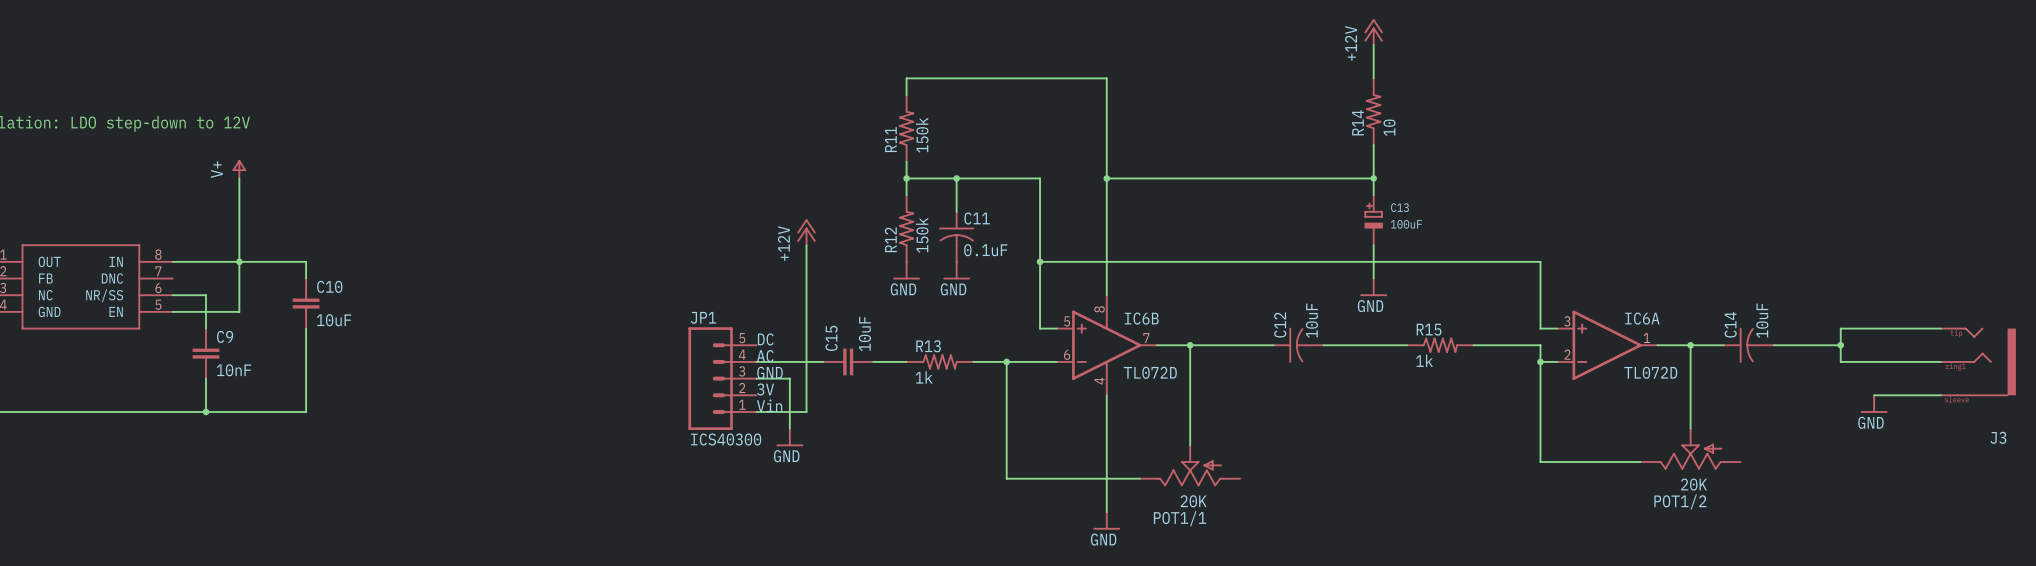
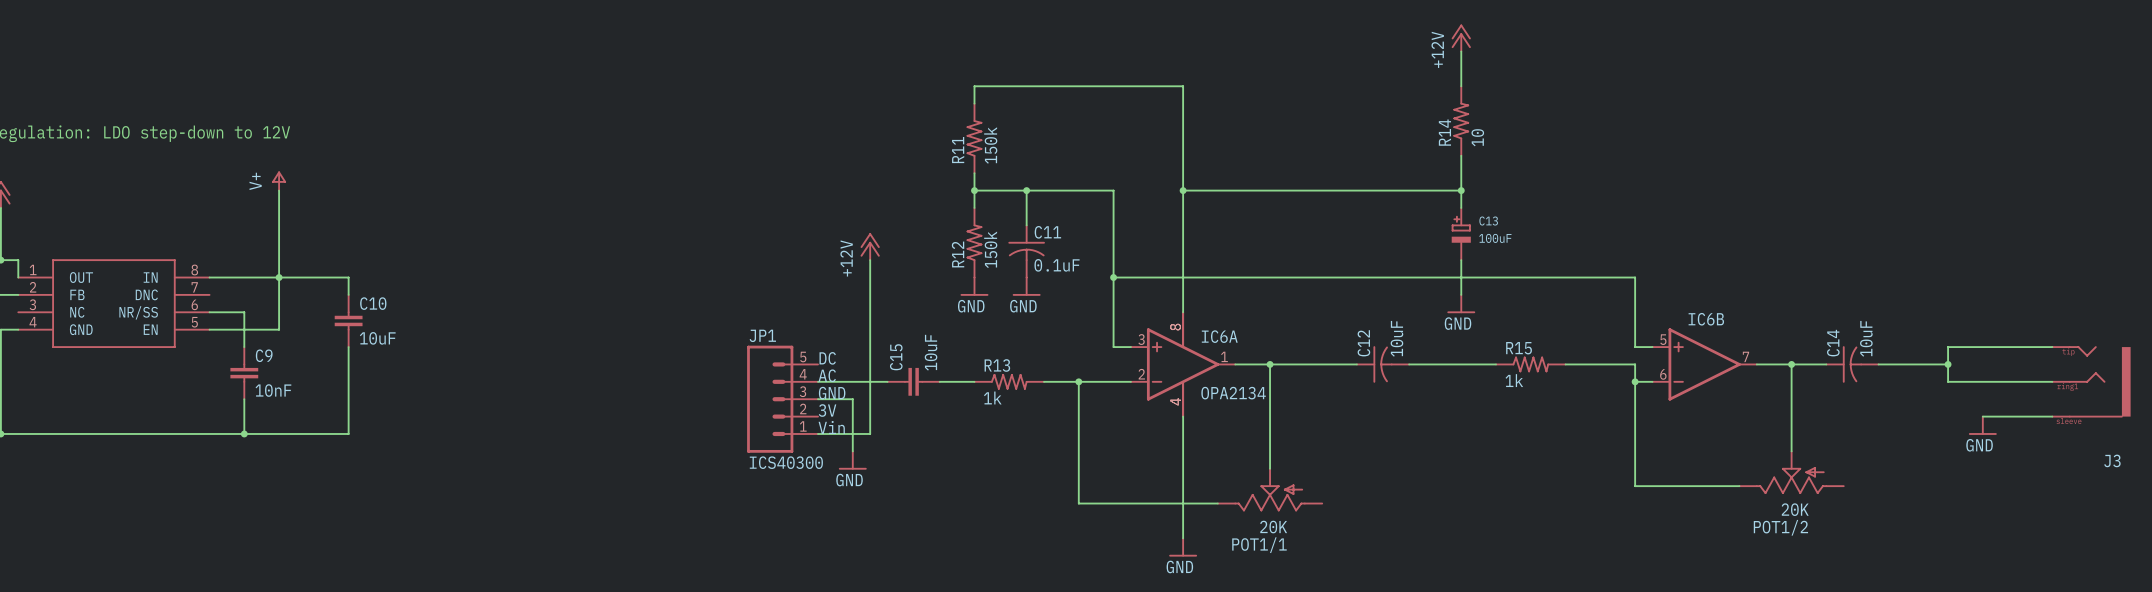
IC6A symbol: [1557, 310, 1658, 380] -> [1130, 312, 1236, 417]
IC6B name position: IC6B (1141, 318) -> IC6B (1706, 319)
IC6B position: (1106, 345) -> (1704, 364)
IC6B value: TL072D (1150, 372) -> none
IC6A text: none -> OPA2134 (1233, 393)
IC6A value: TL072D (1650, 372) -> none

